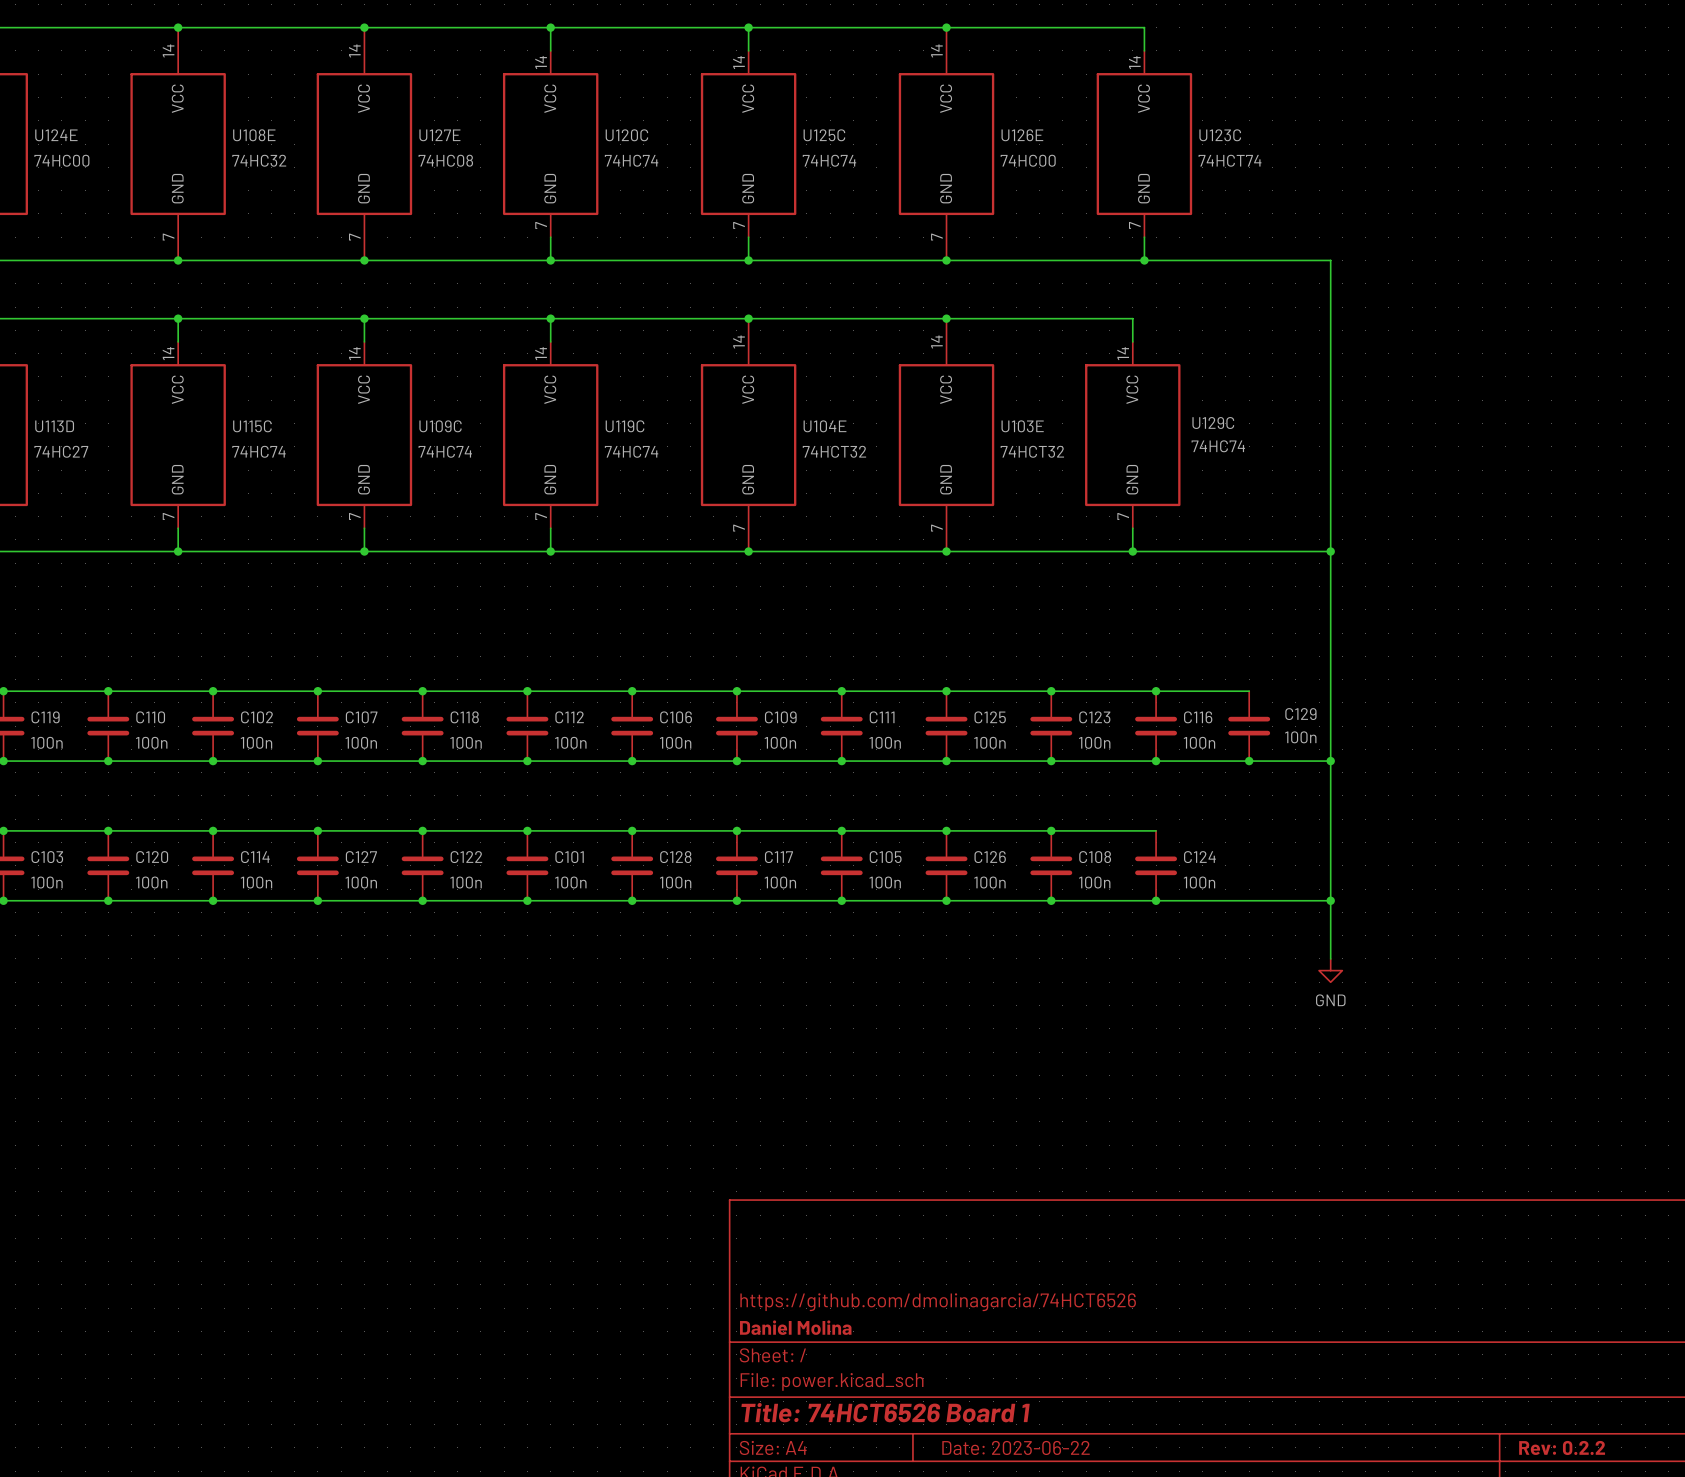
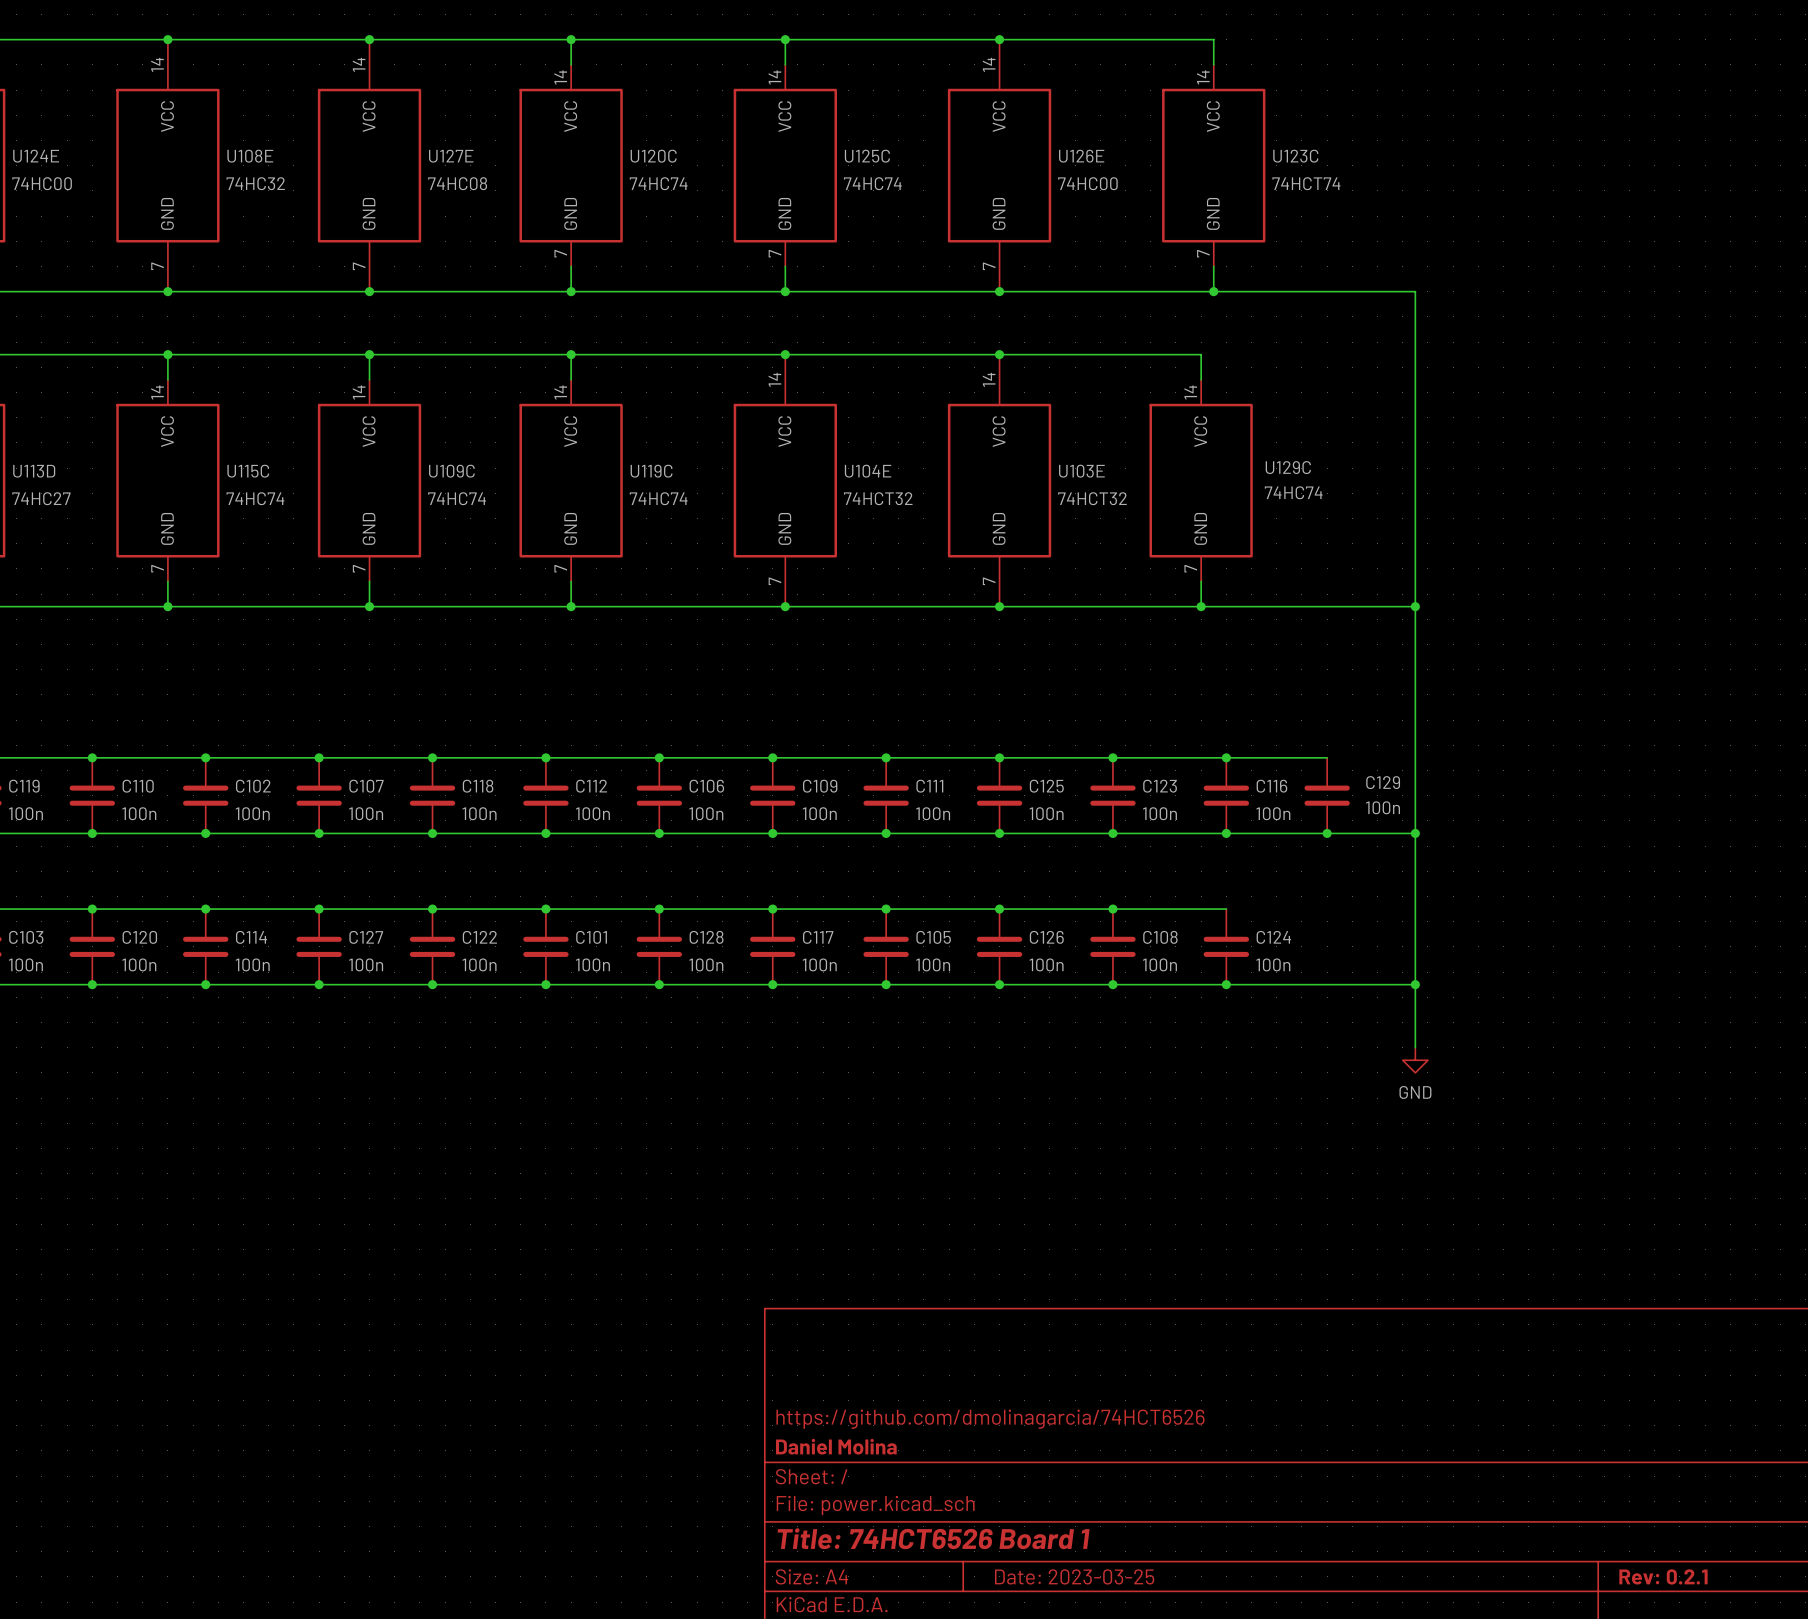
title block: Date: 2023-06-22 (1016, 1447) -> Date: 2023-03-25 (1074, 1576)
title block: Rev: 0.2.2 (1562, 1447) -> Rev: 0.2.1 (1663, 1576)

